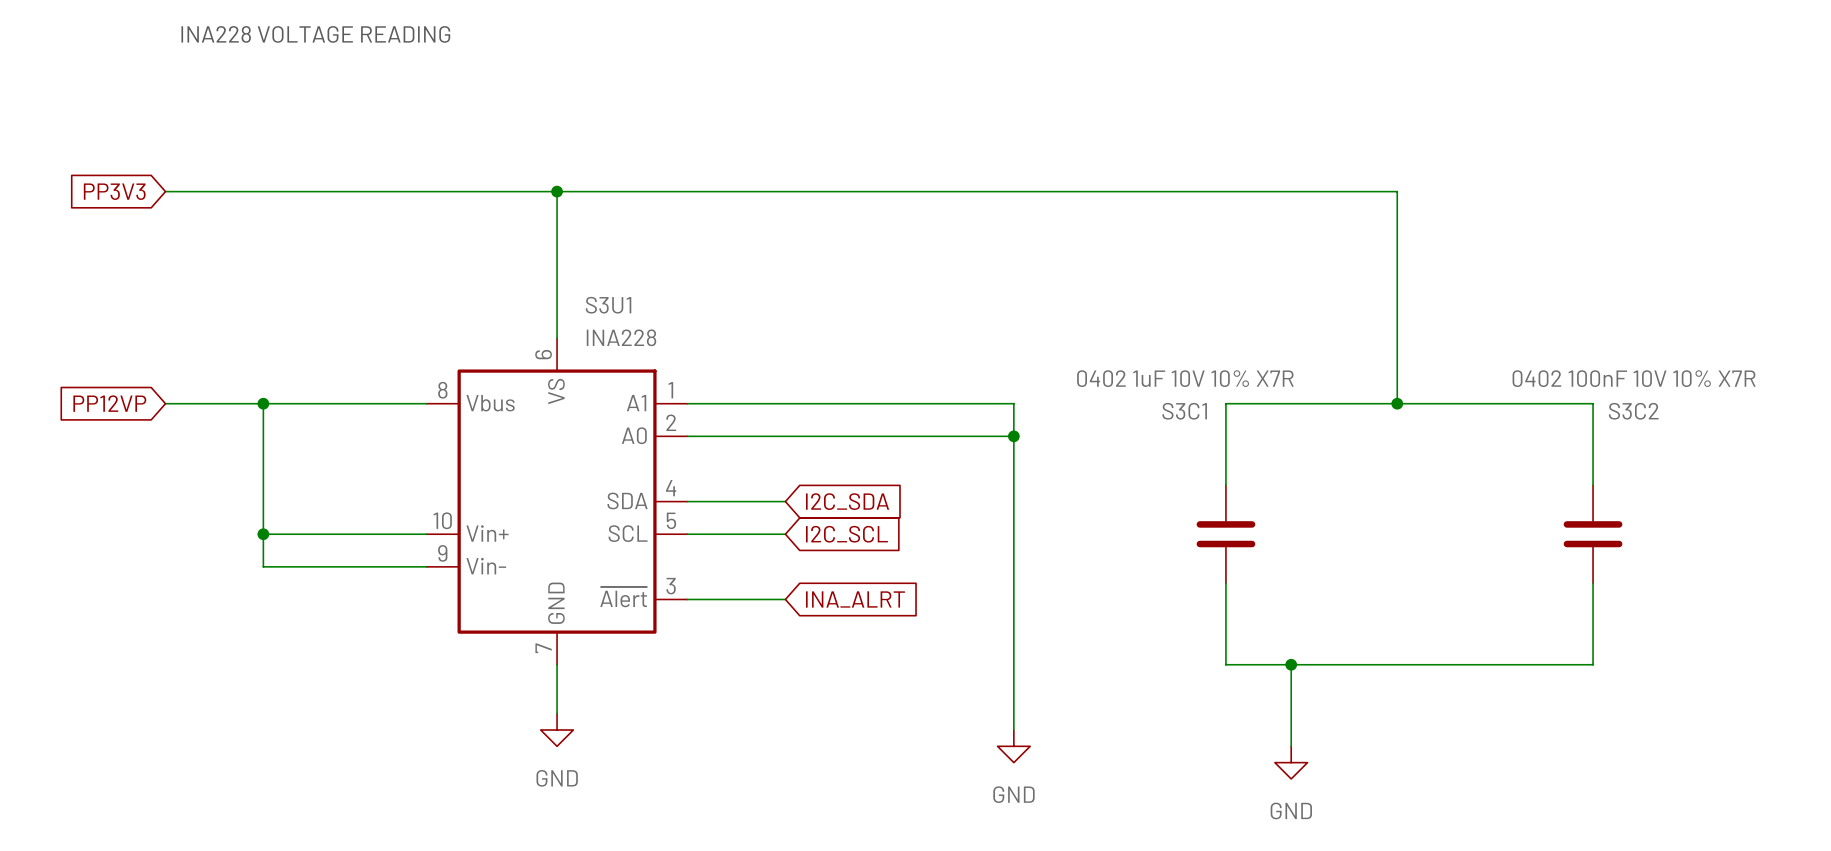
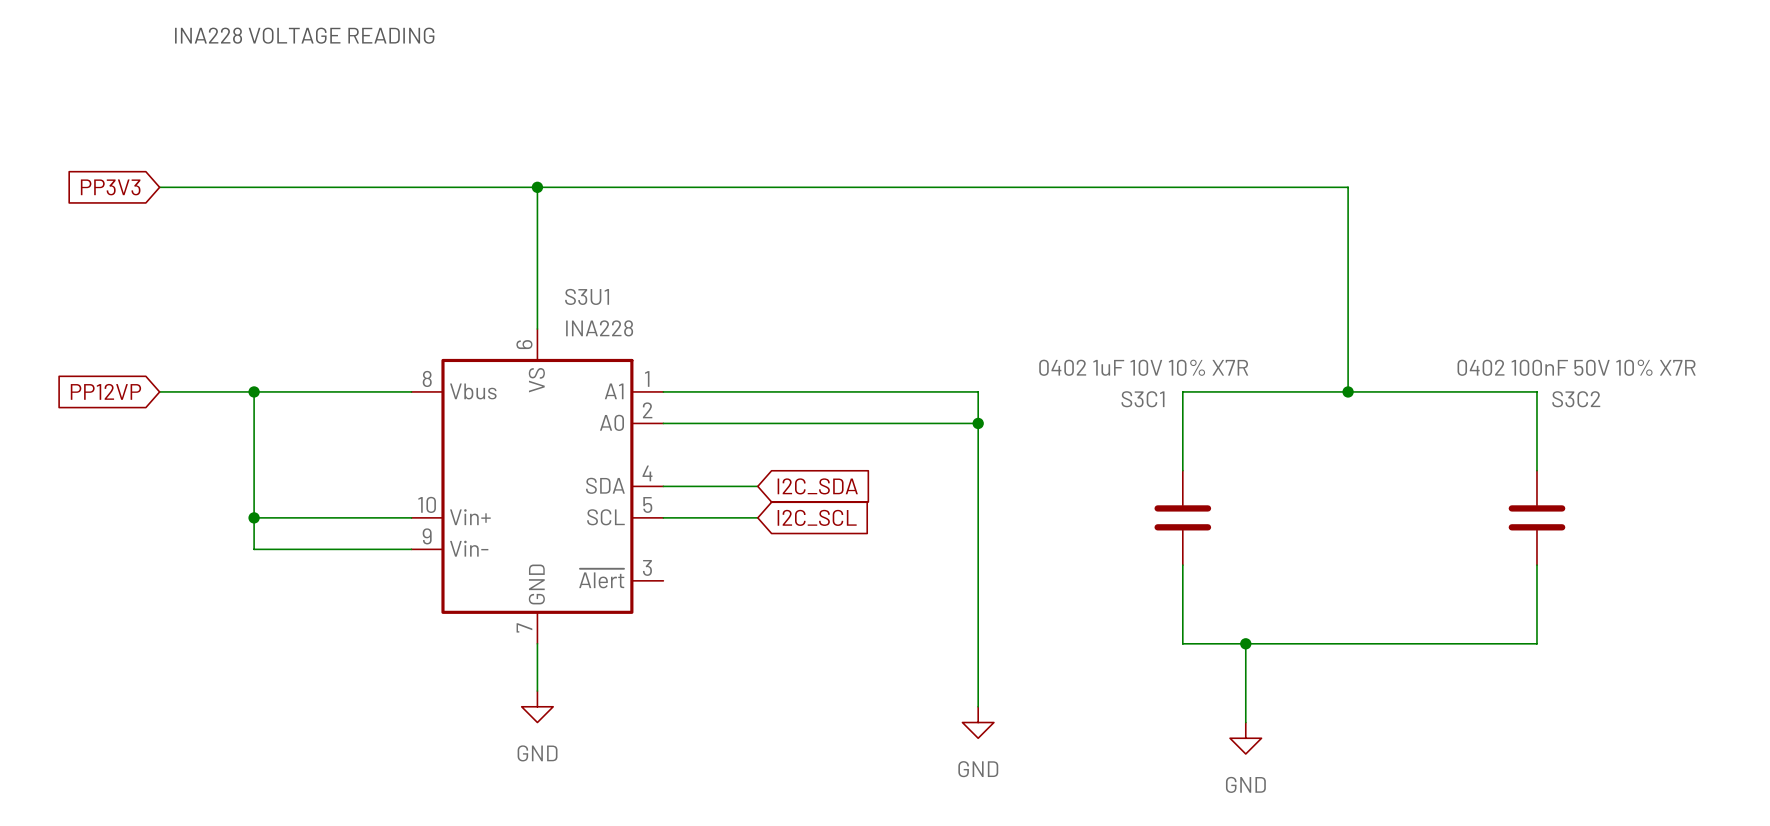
S3C2 value: 0402 100nF 10V 10% X7R (1634, 378) -> 0402 100nF 50V 10% X7R (1576, 367)
wire: (687, 599) (785, 599) -> none
global label: INA_ALRT (855, 599) -> none

